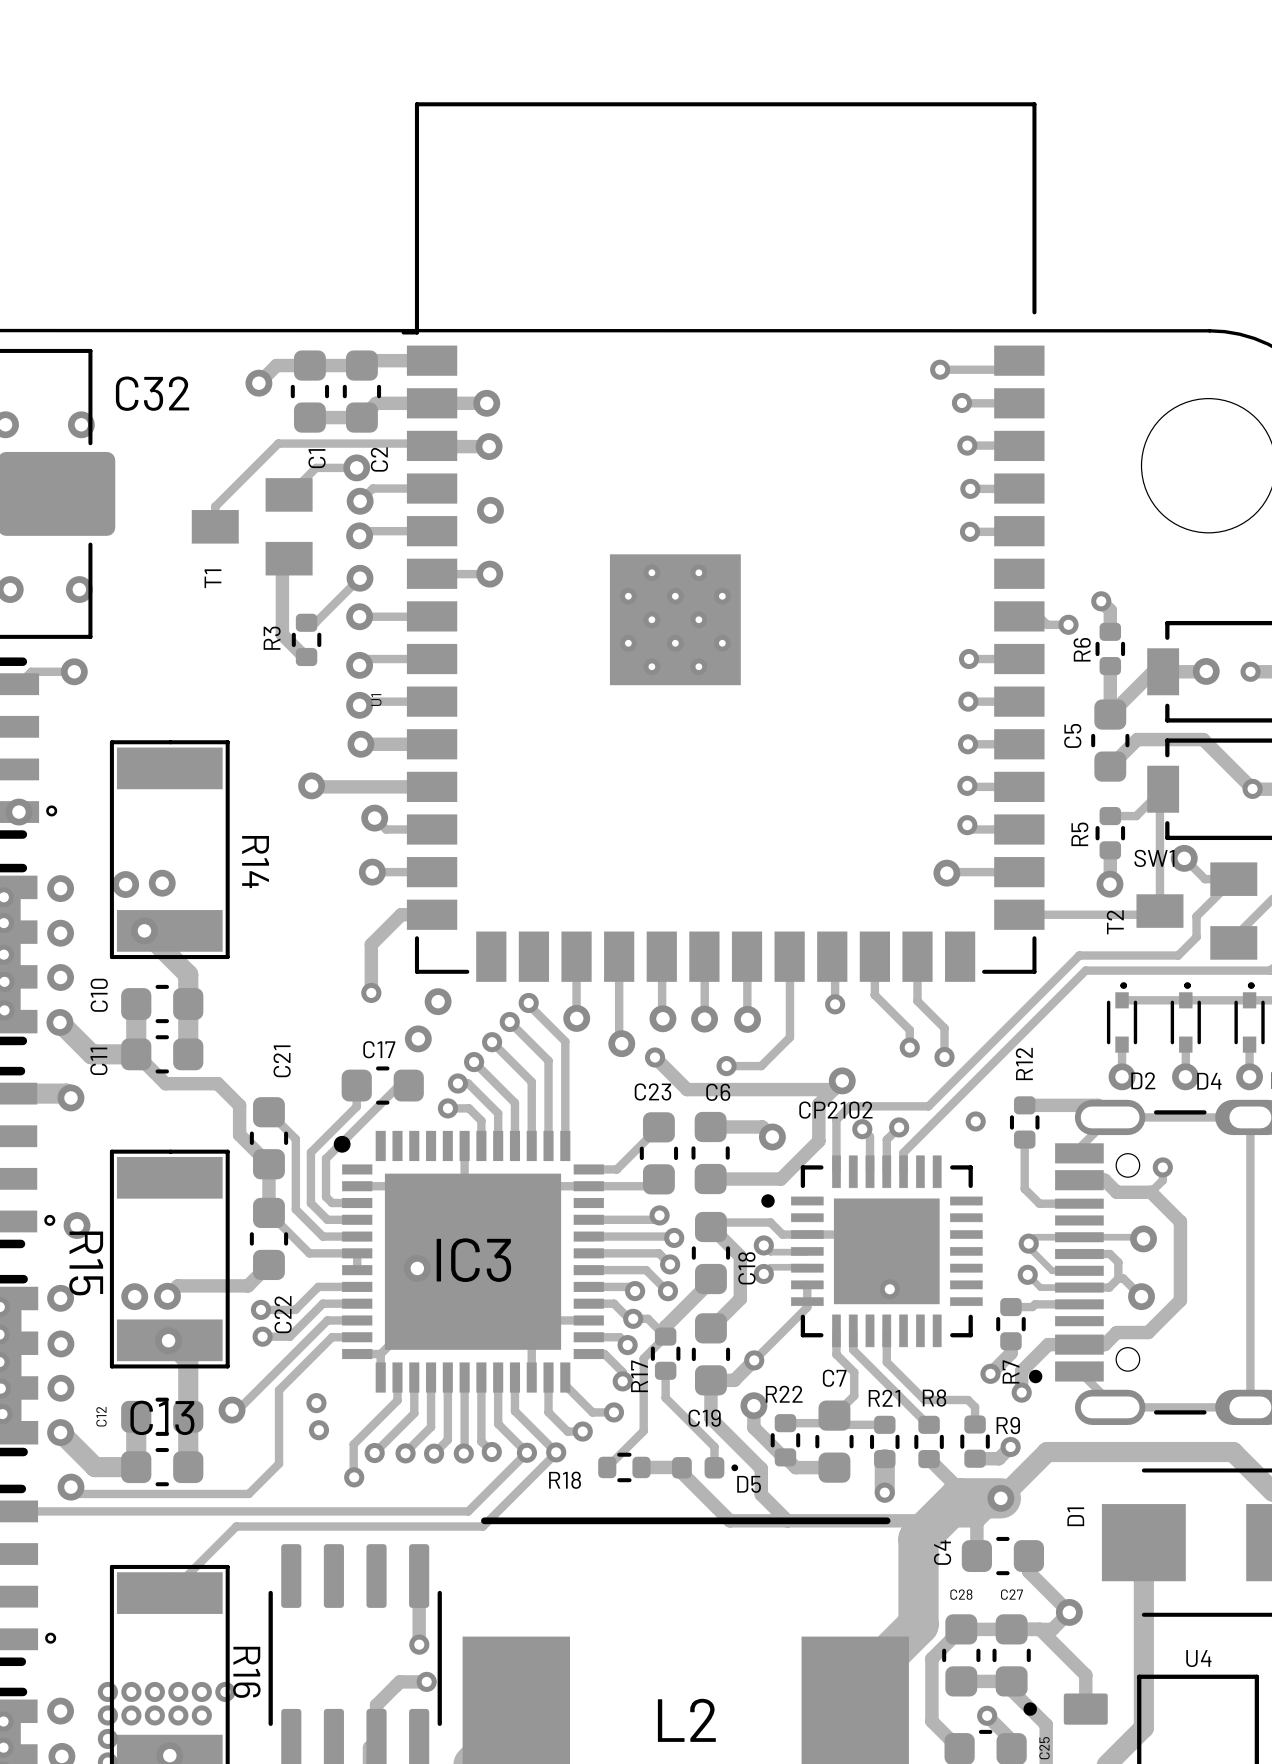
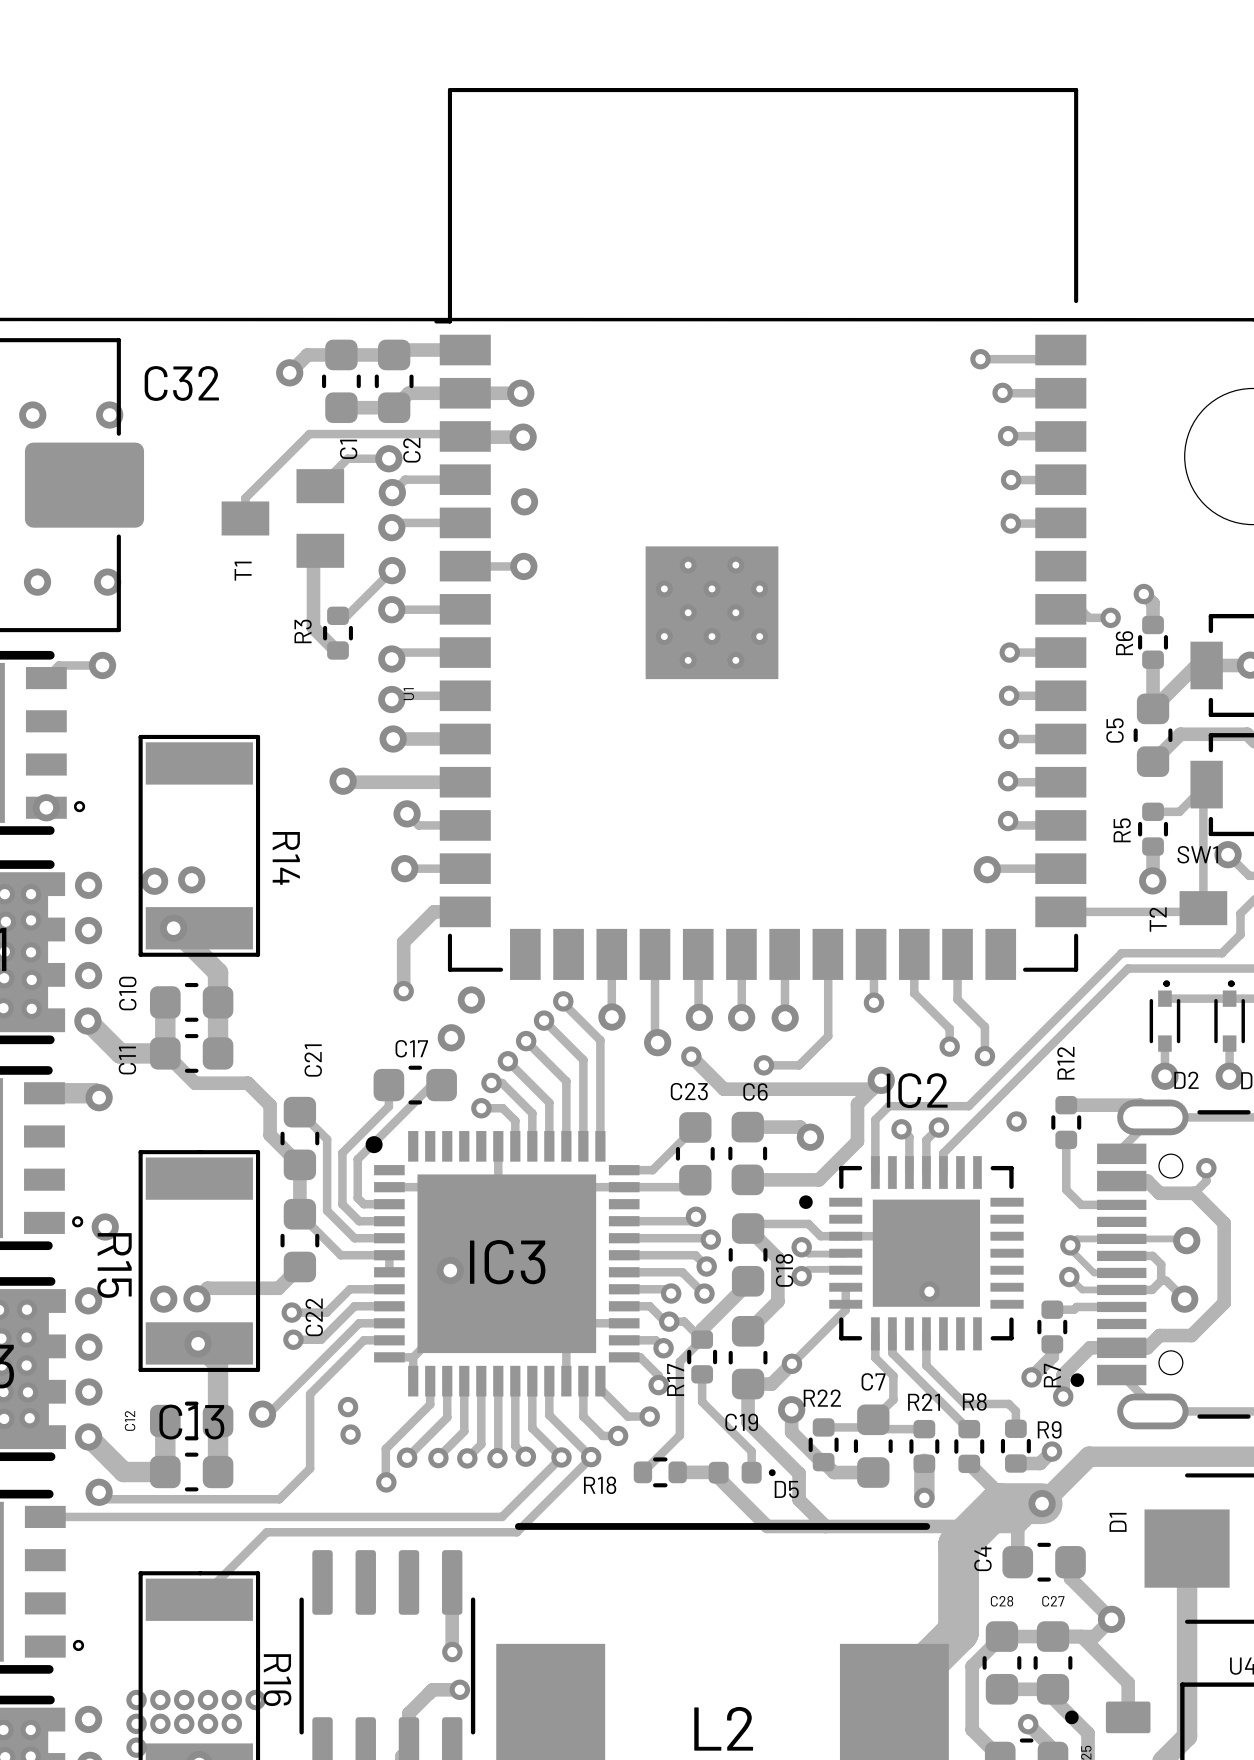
CP2102 name: CP2102 (835, 1110) -> IC2 (917, 1090)

